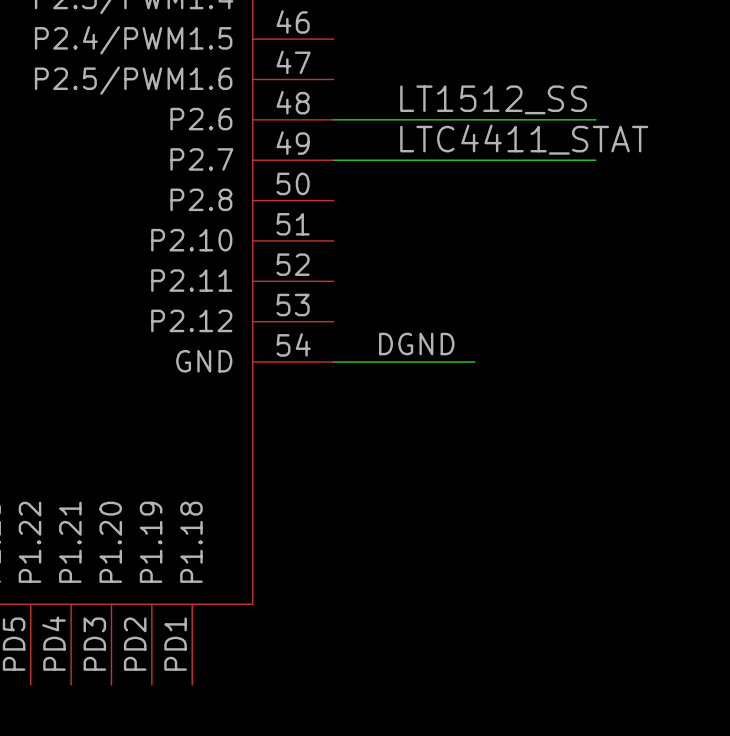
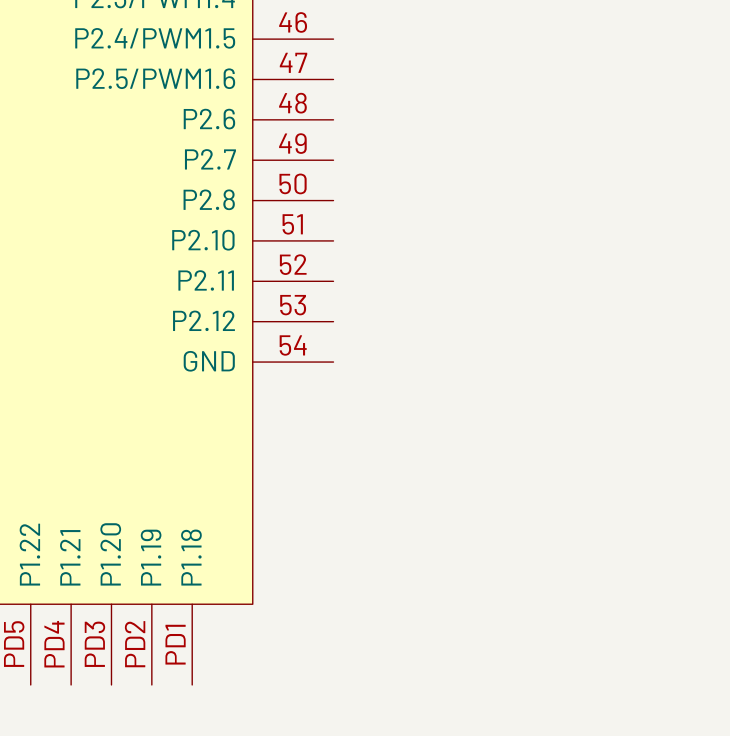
label: LT1512_SS (493, 99) -> none
wire: (333, 119) (595, 119) -> none
label: LTC4411_STAT (524, 139) -> none
wire: (333, 160) (595, 160) -> none
label: DGND (416, 344) -> none
wire: (333, 362) (474, 362) -> none

